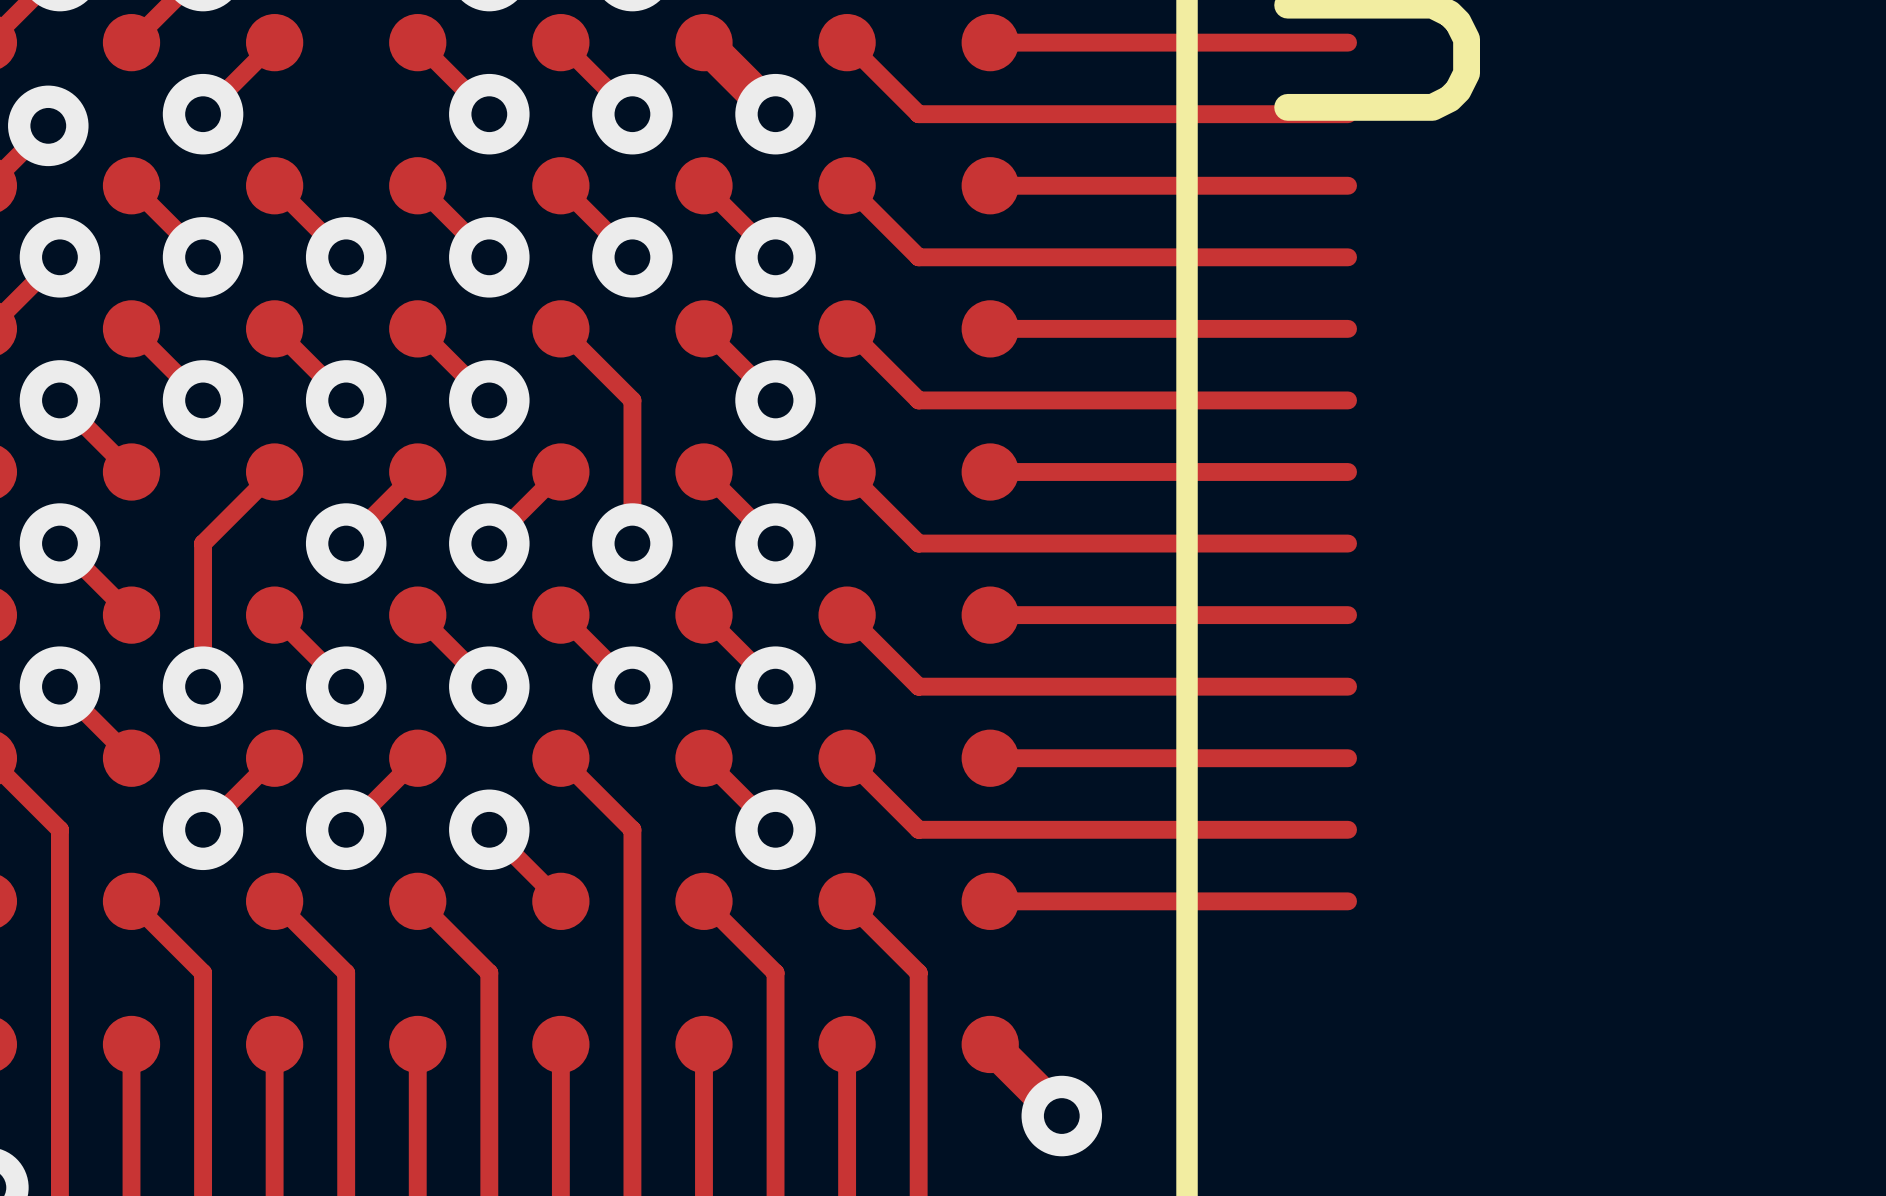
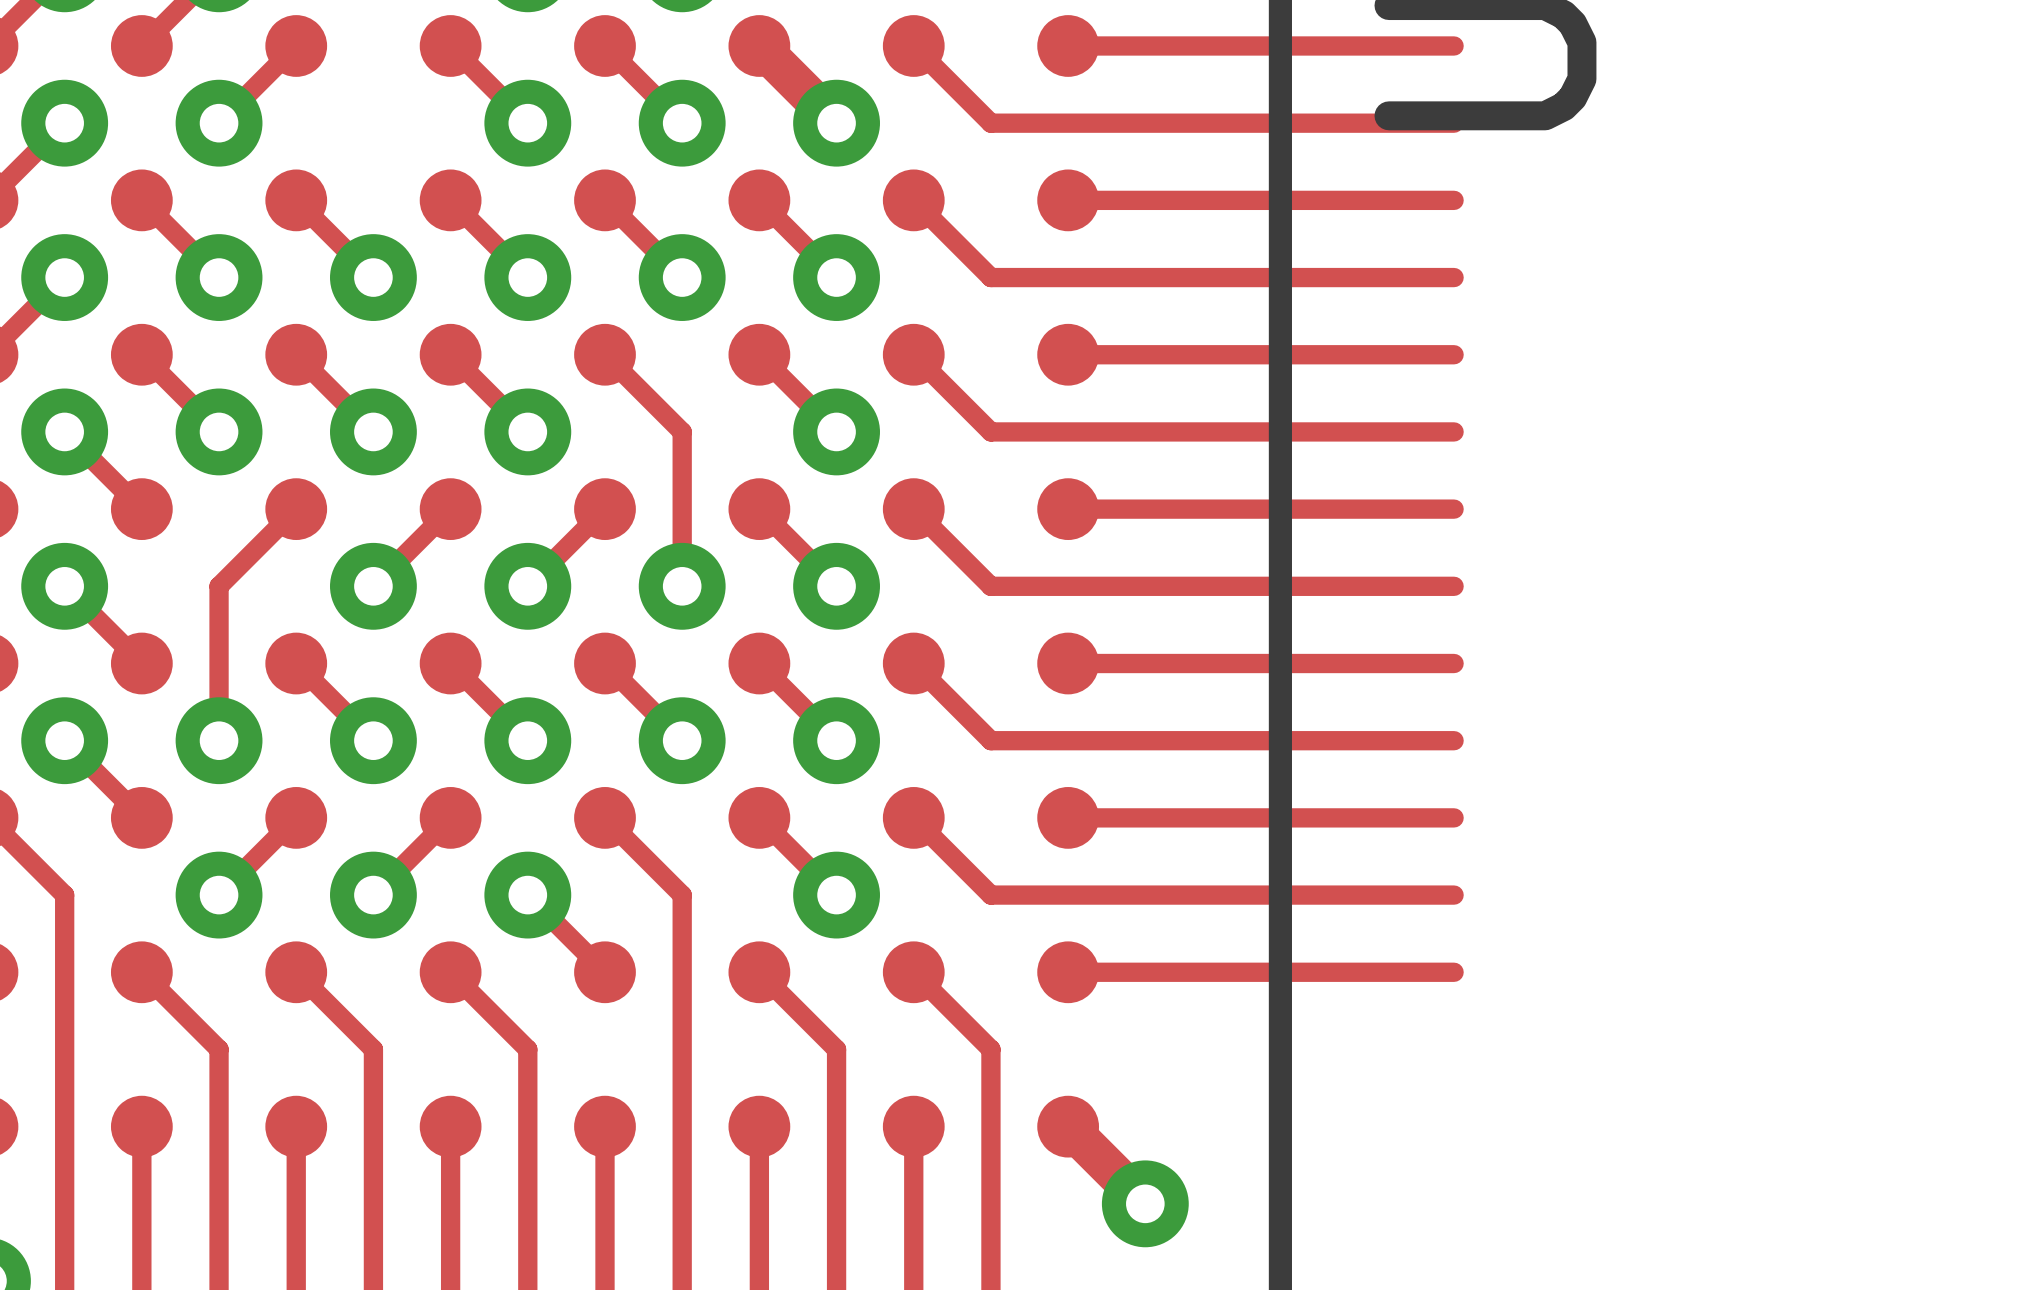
via position: (48, 125) -> (64, 123)

